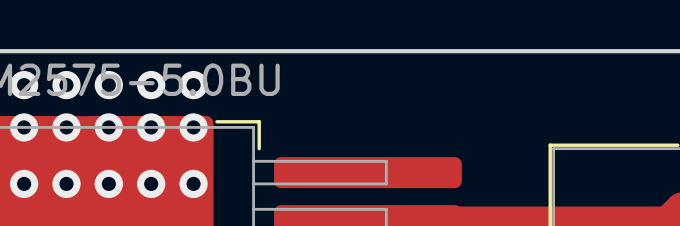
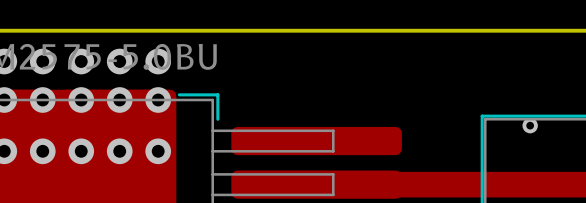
via: none -> (530, 125)

